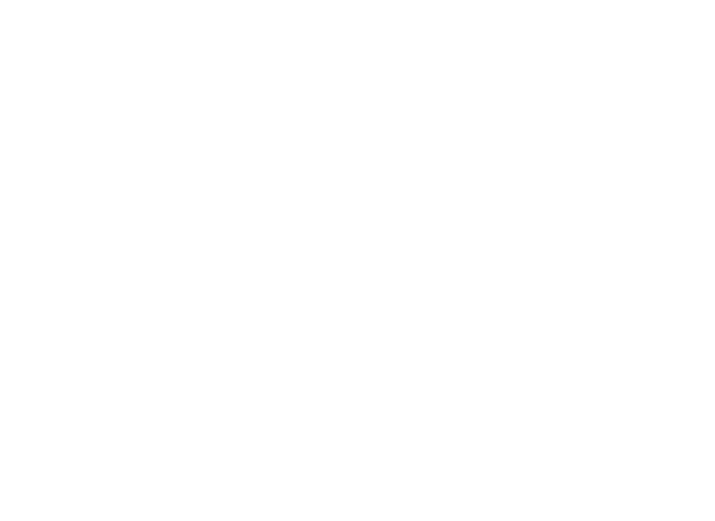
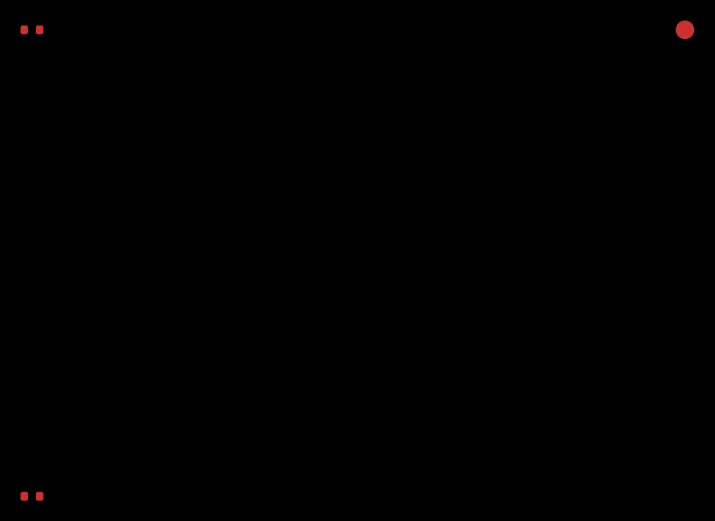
part: none -> (31, 29)
part: none -> (684, 29)
part: none -> (31, 496)

